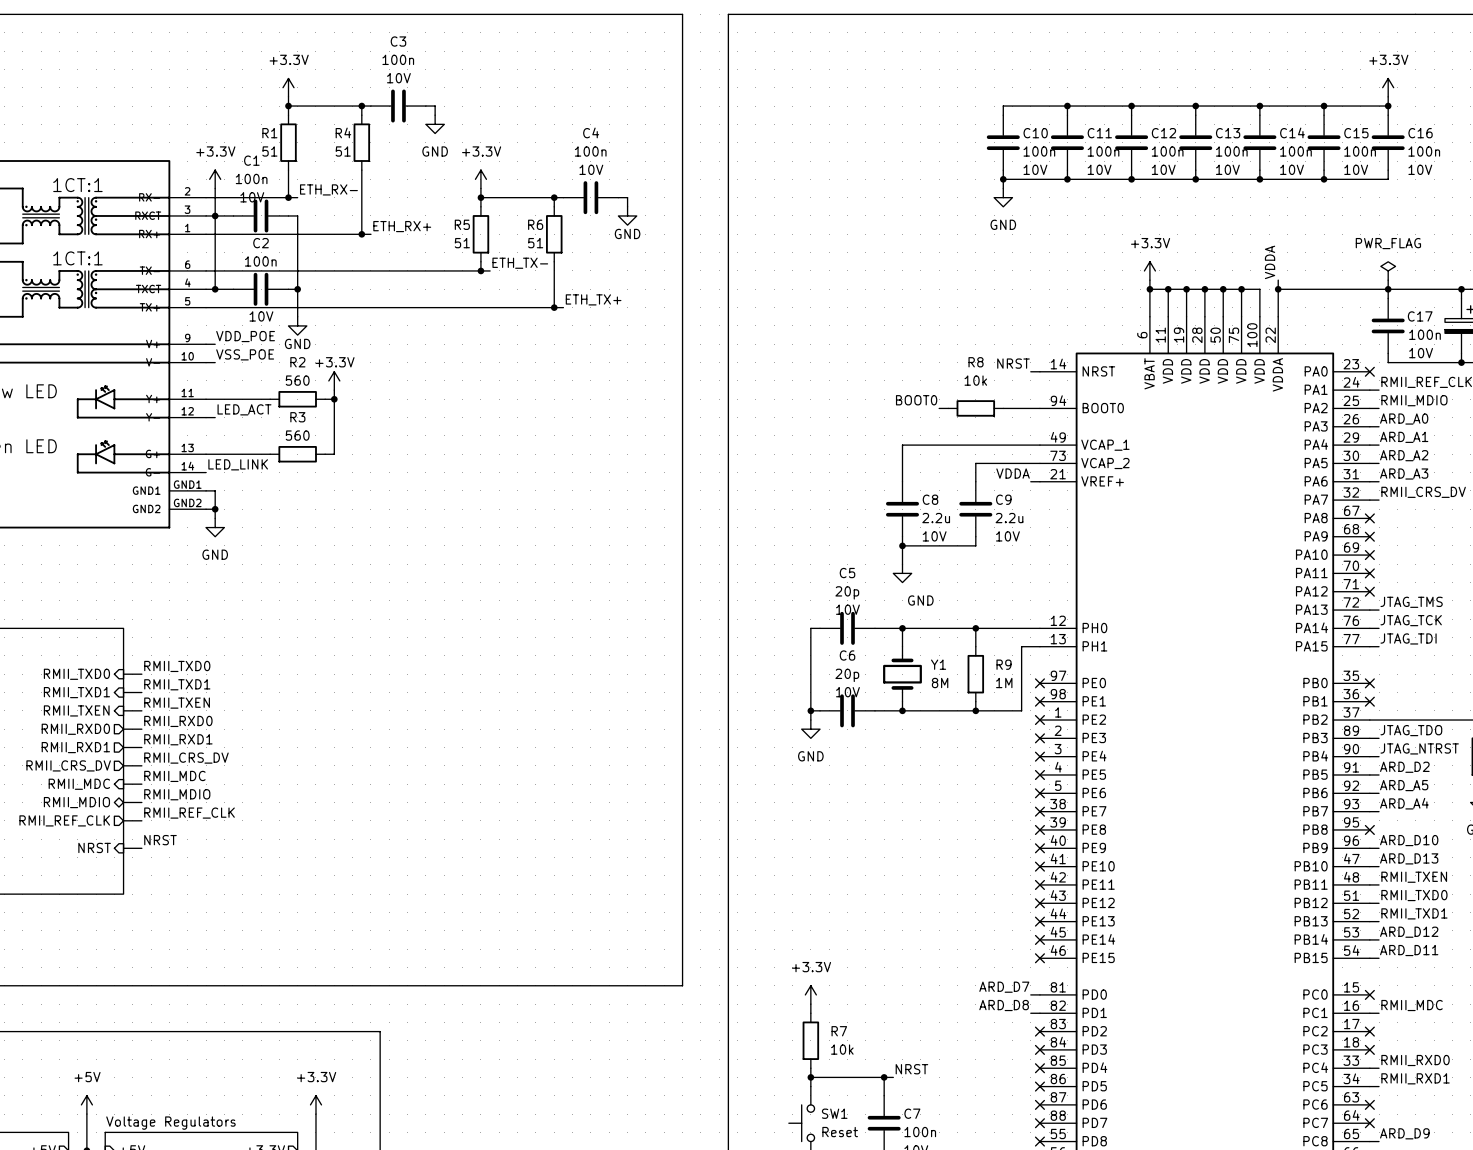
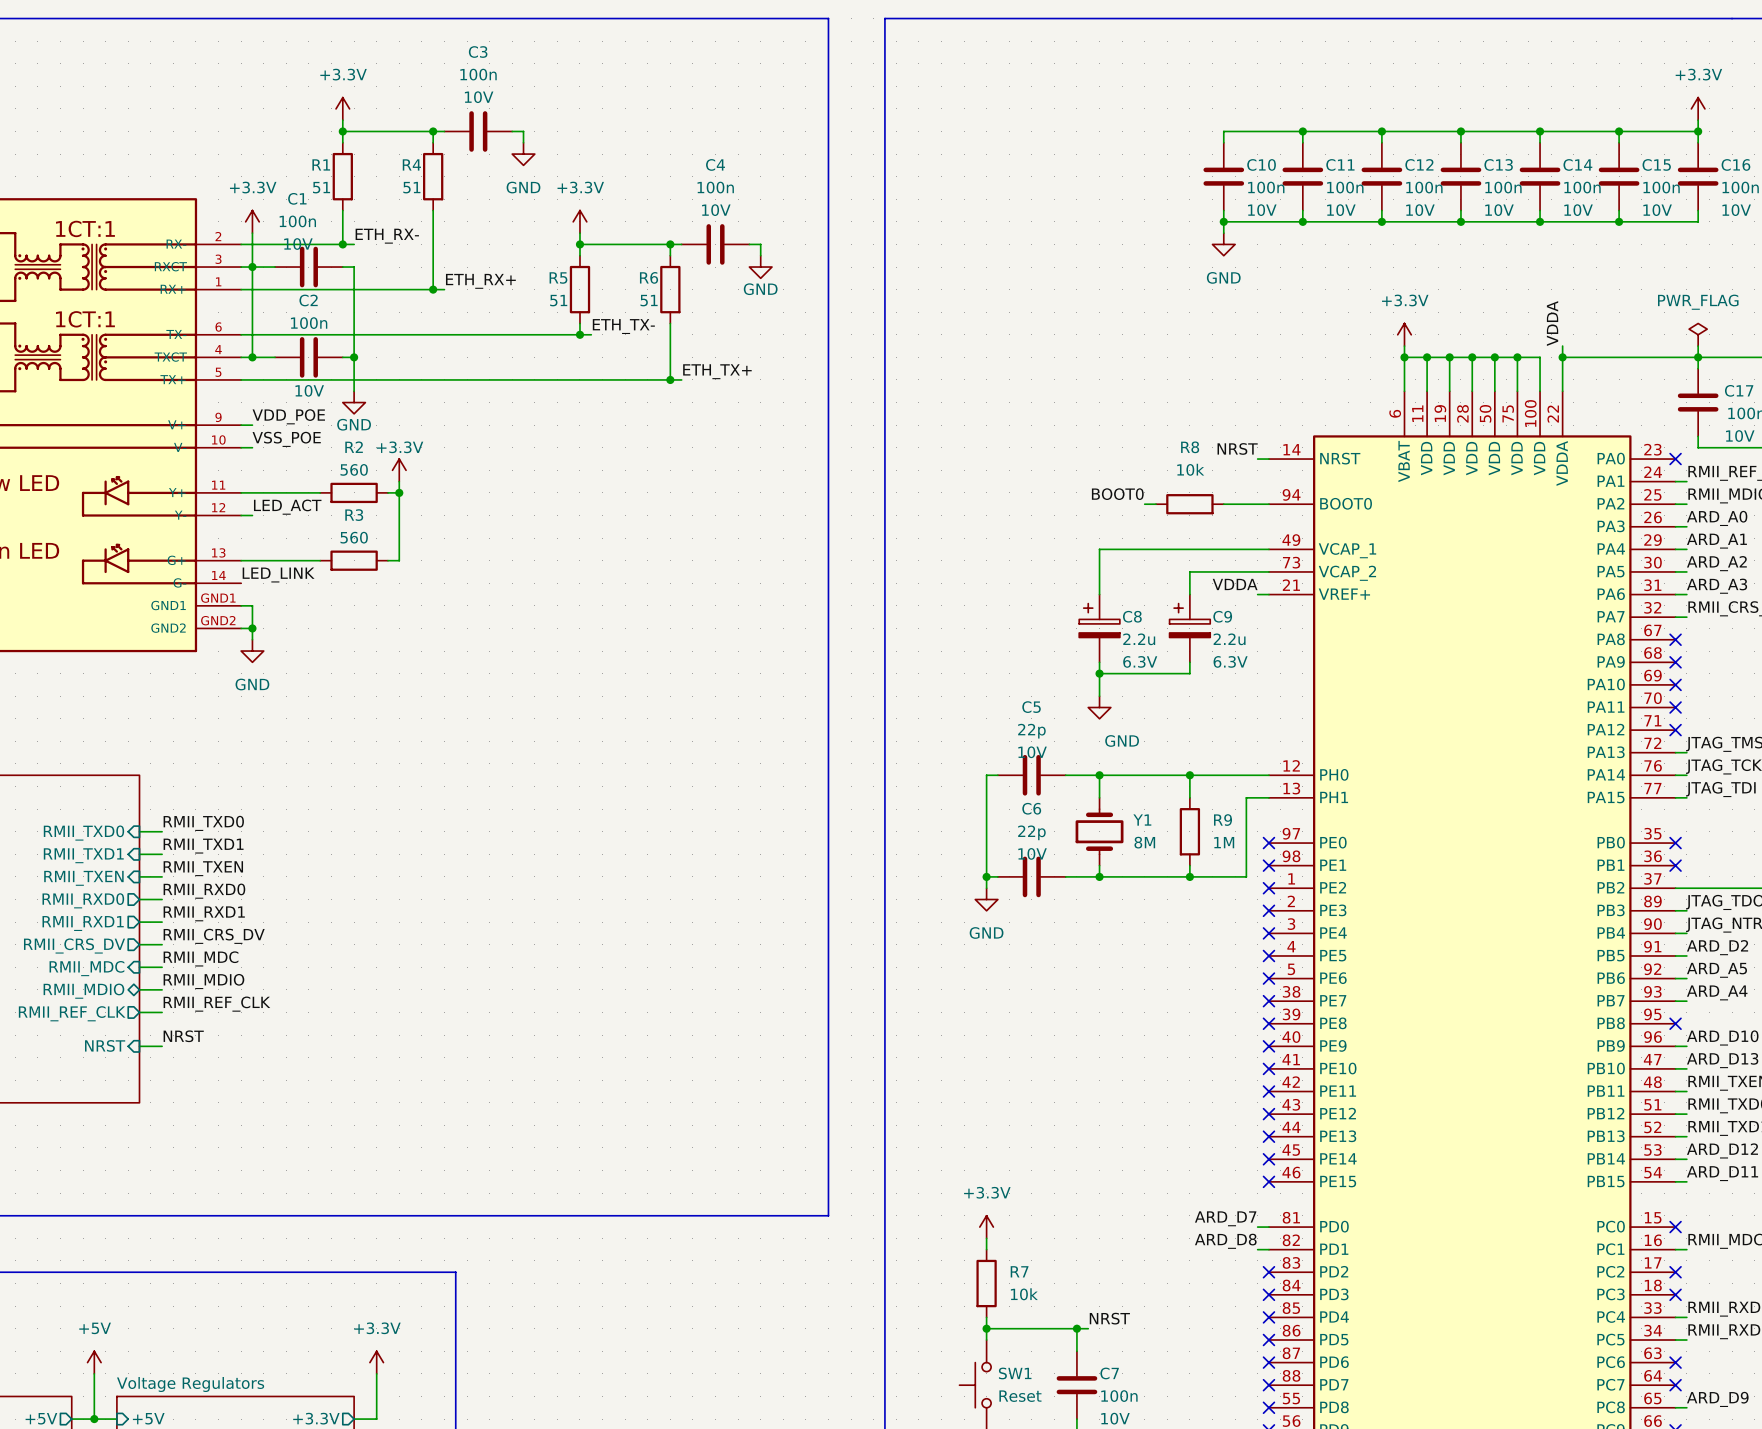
C8 symbol: [886, 481, 919, 537] -> [1079, 594, 1120, 663]
C9 symbol: [959, 481, 993, 537] -> [1169, 594, 1211, 663]
C8 text: 10V (934, 536) -> 6.3V (1140, 661)
C9 text: 10V (1007, 536) -> 6.3V (1230, 661)
C5 value: 20p (847, 592) -> 22p (1031, 731)
C6 value: 20p (847, 675) -> 22p (1031, 832)

